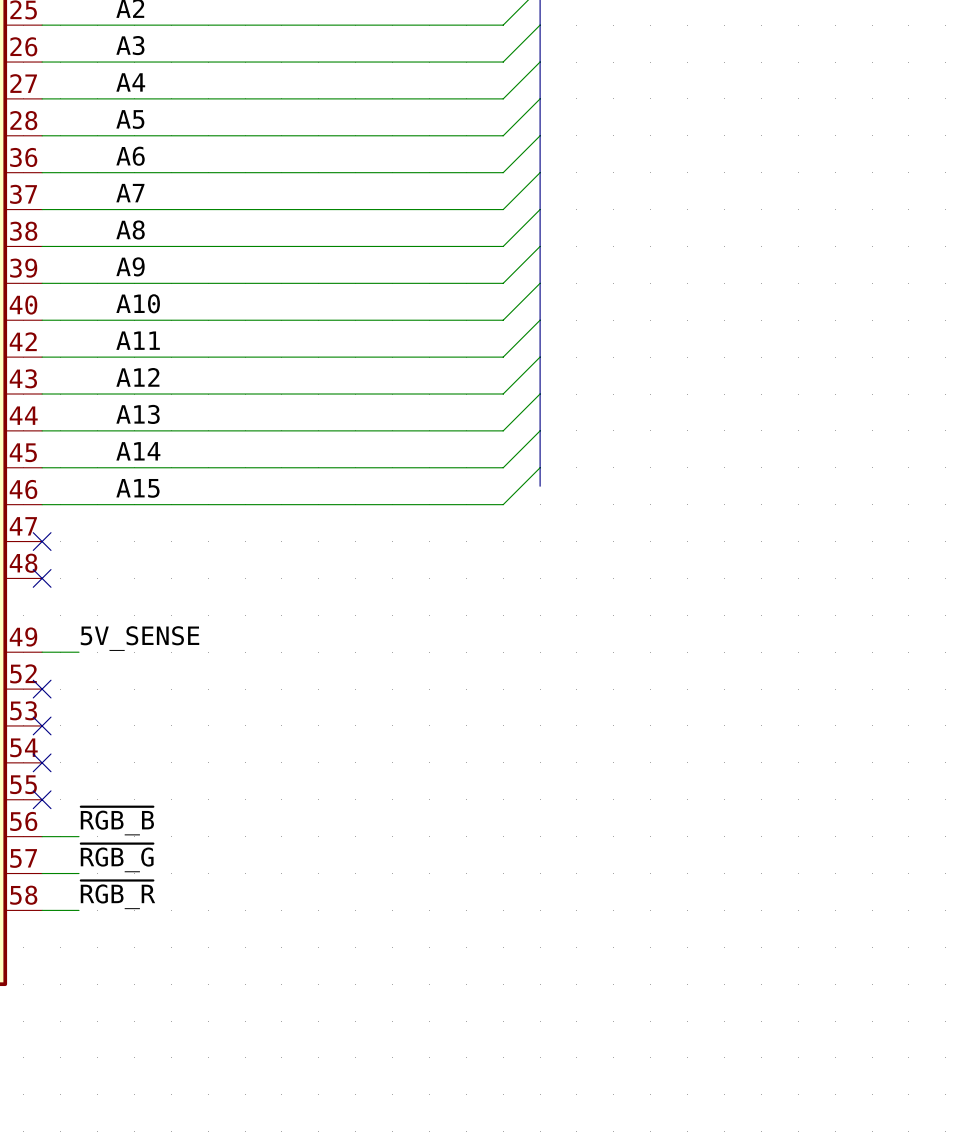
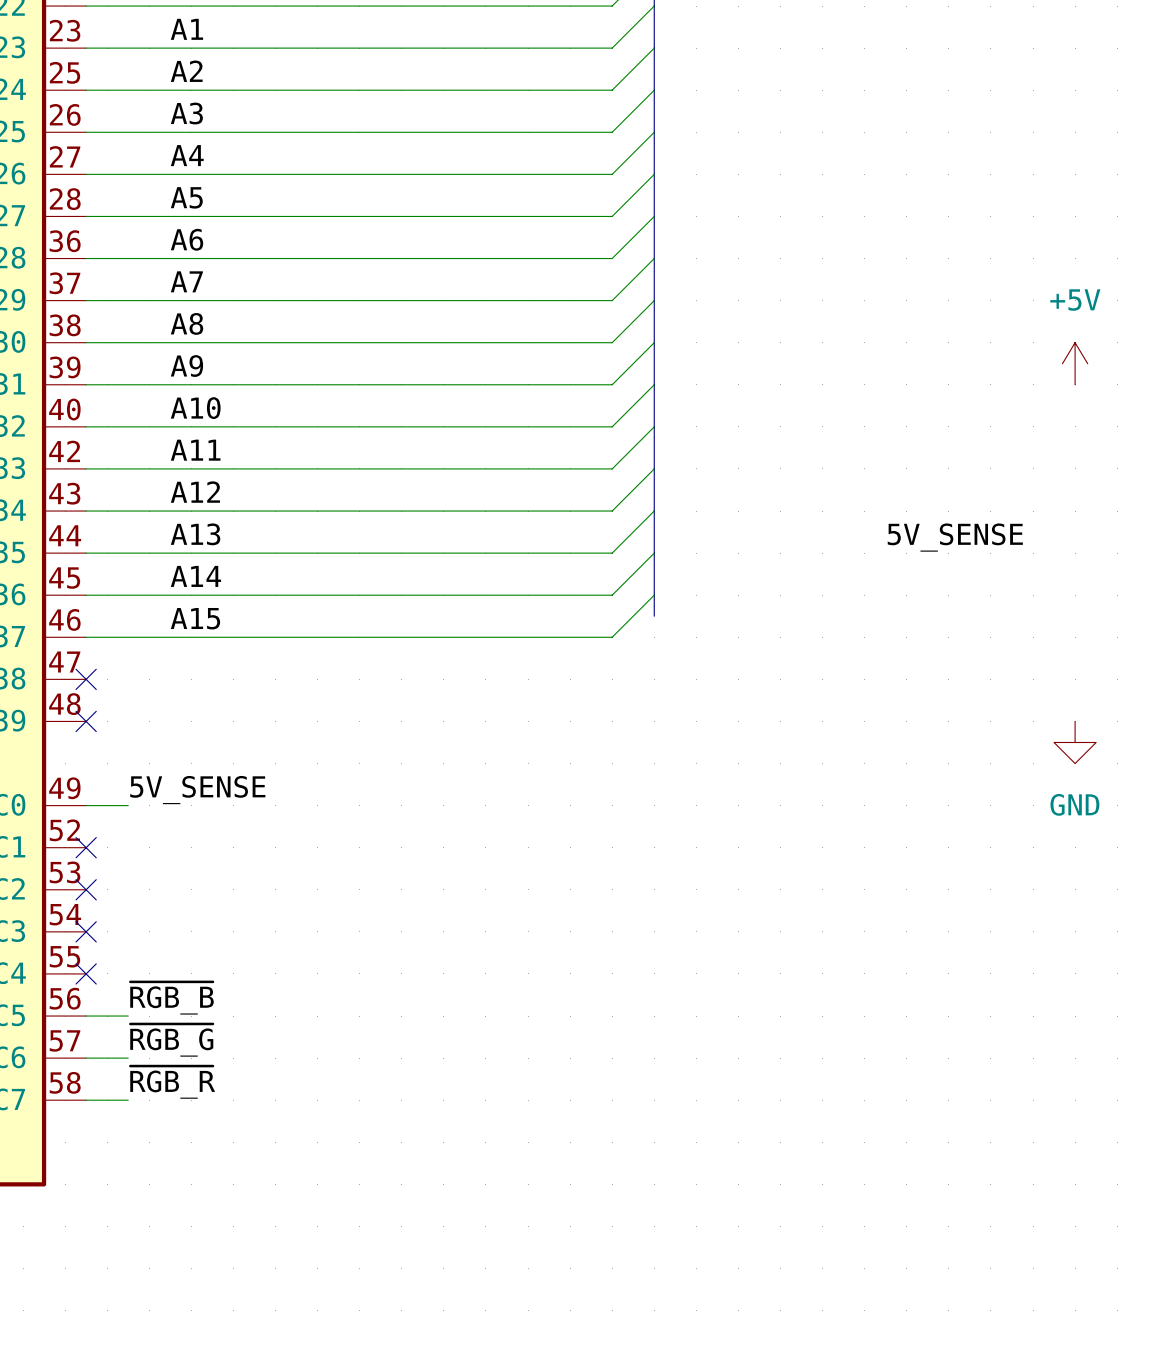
power symbol: none -> +5V (1075, 363)
label: none -> 5V_SENSE (955, 537)
power symbol: none -> GND (1075, 742)

